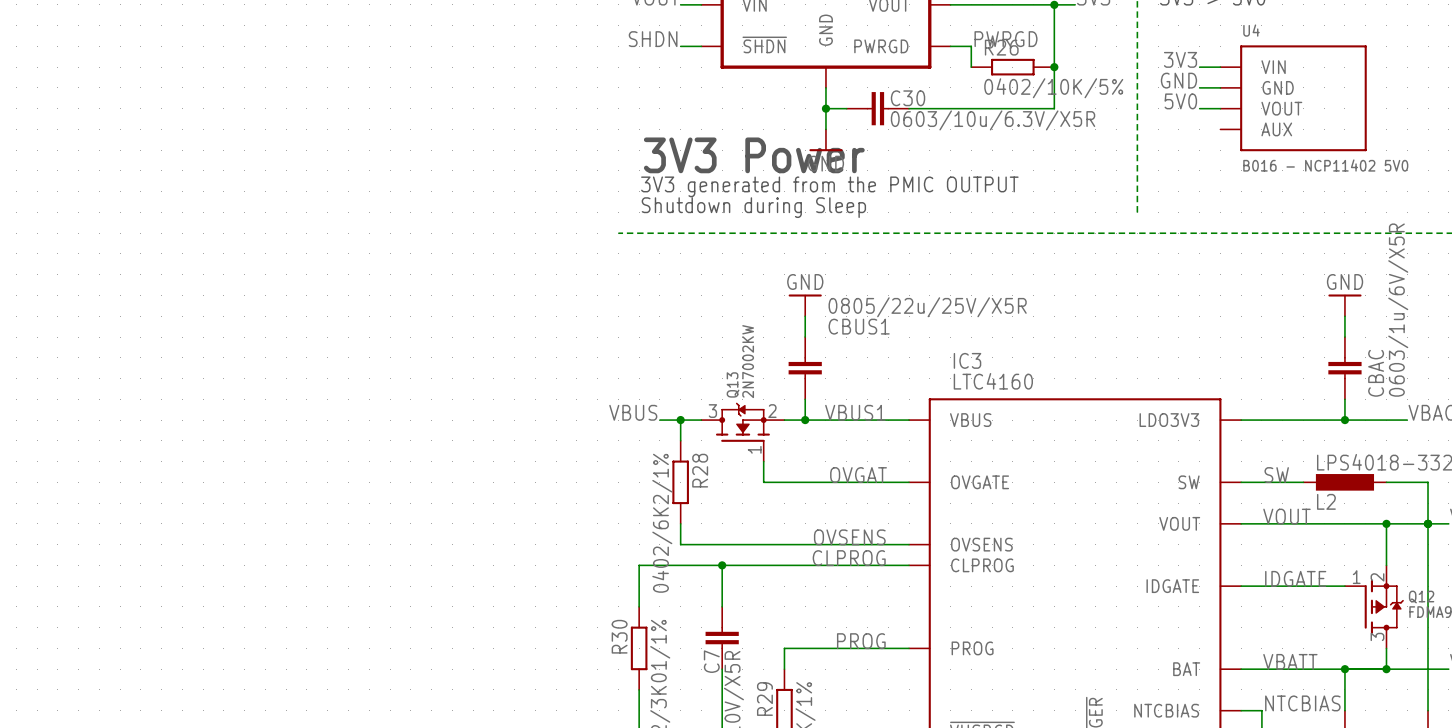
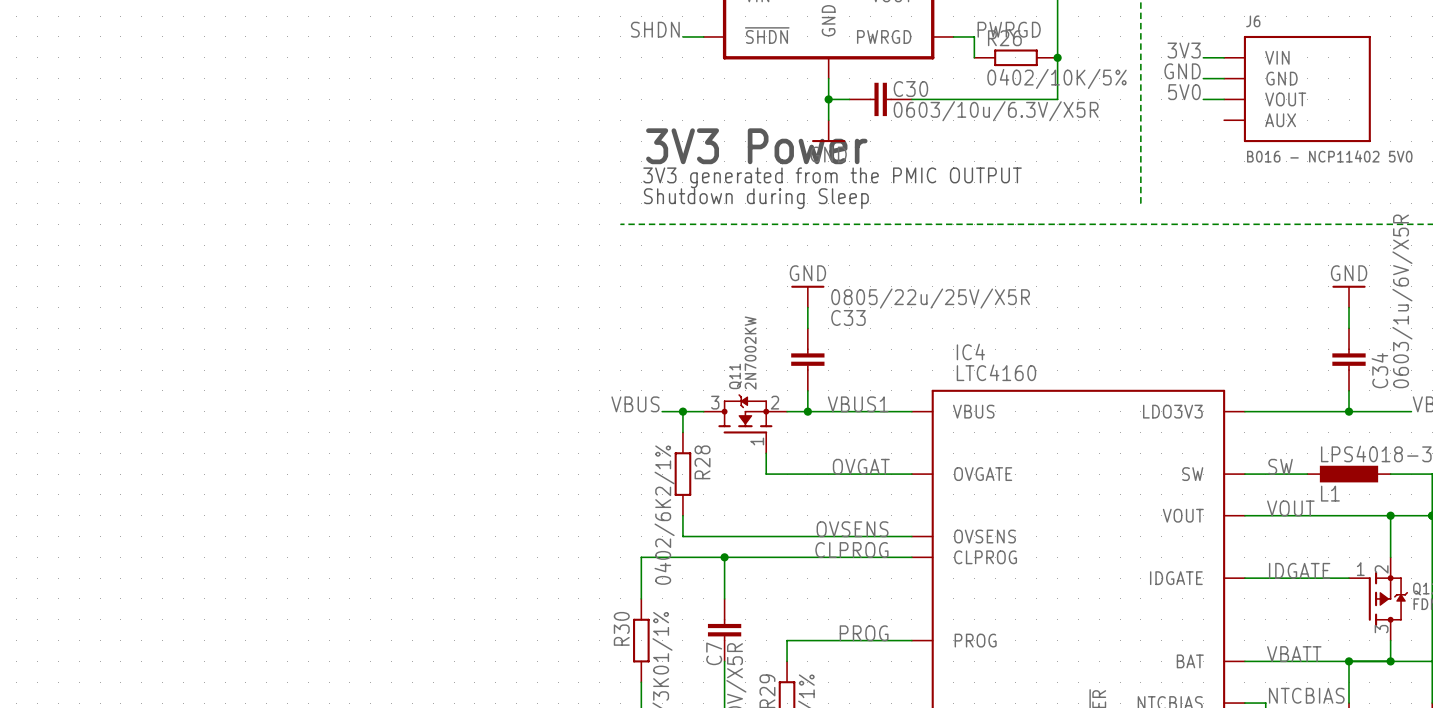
U4 name: U4 (1251, 30) -> J6 (1253, 21)
CBUS1 name: CBUS1 (859, 326) -> C33 (848, 317)
IC3 name: IC3 (967, 360) -> IC4 (970, 351)
CBAC name: CBAC (1376, 373) -> C34 (1379, 370)
Q13 name: Q13 (733, 384) -> Q11 (735, 376)
L2 name: L2 (1326, 501) -> L1 (1330, 493)

